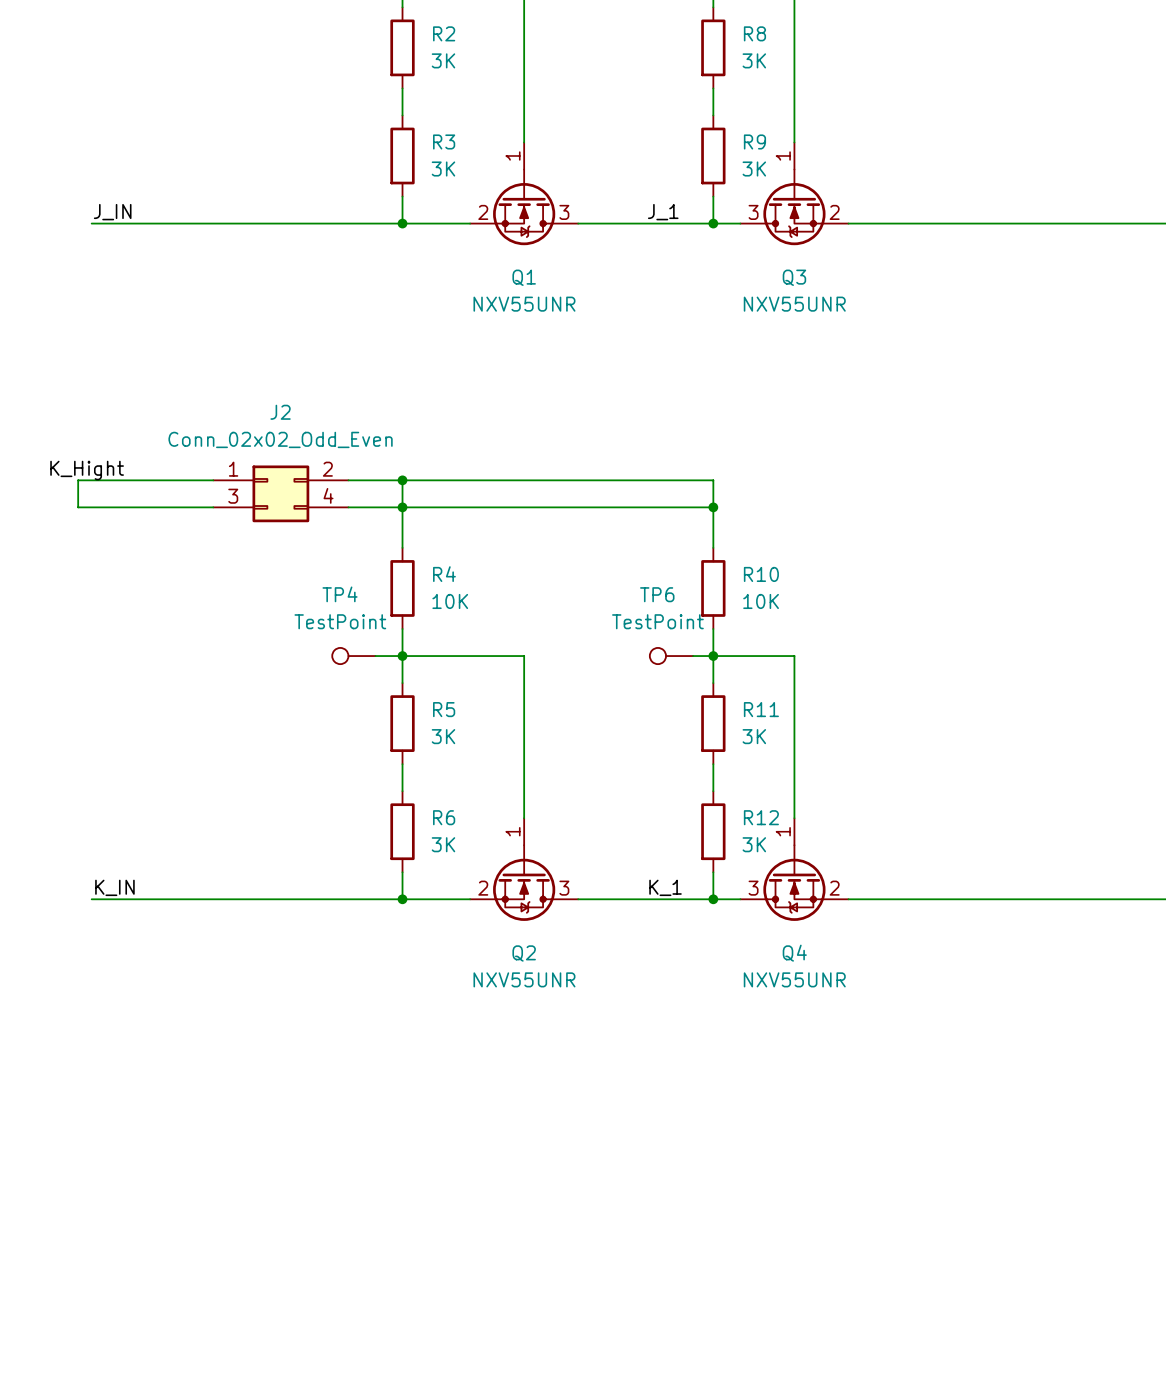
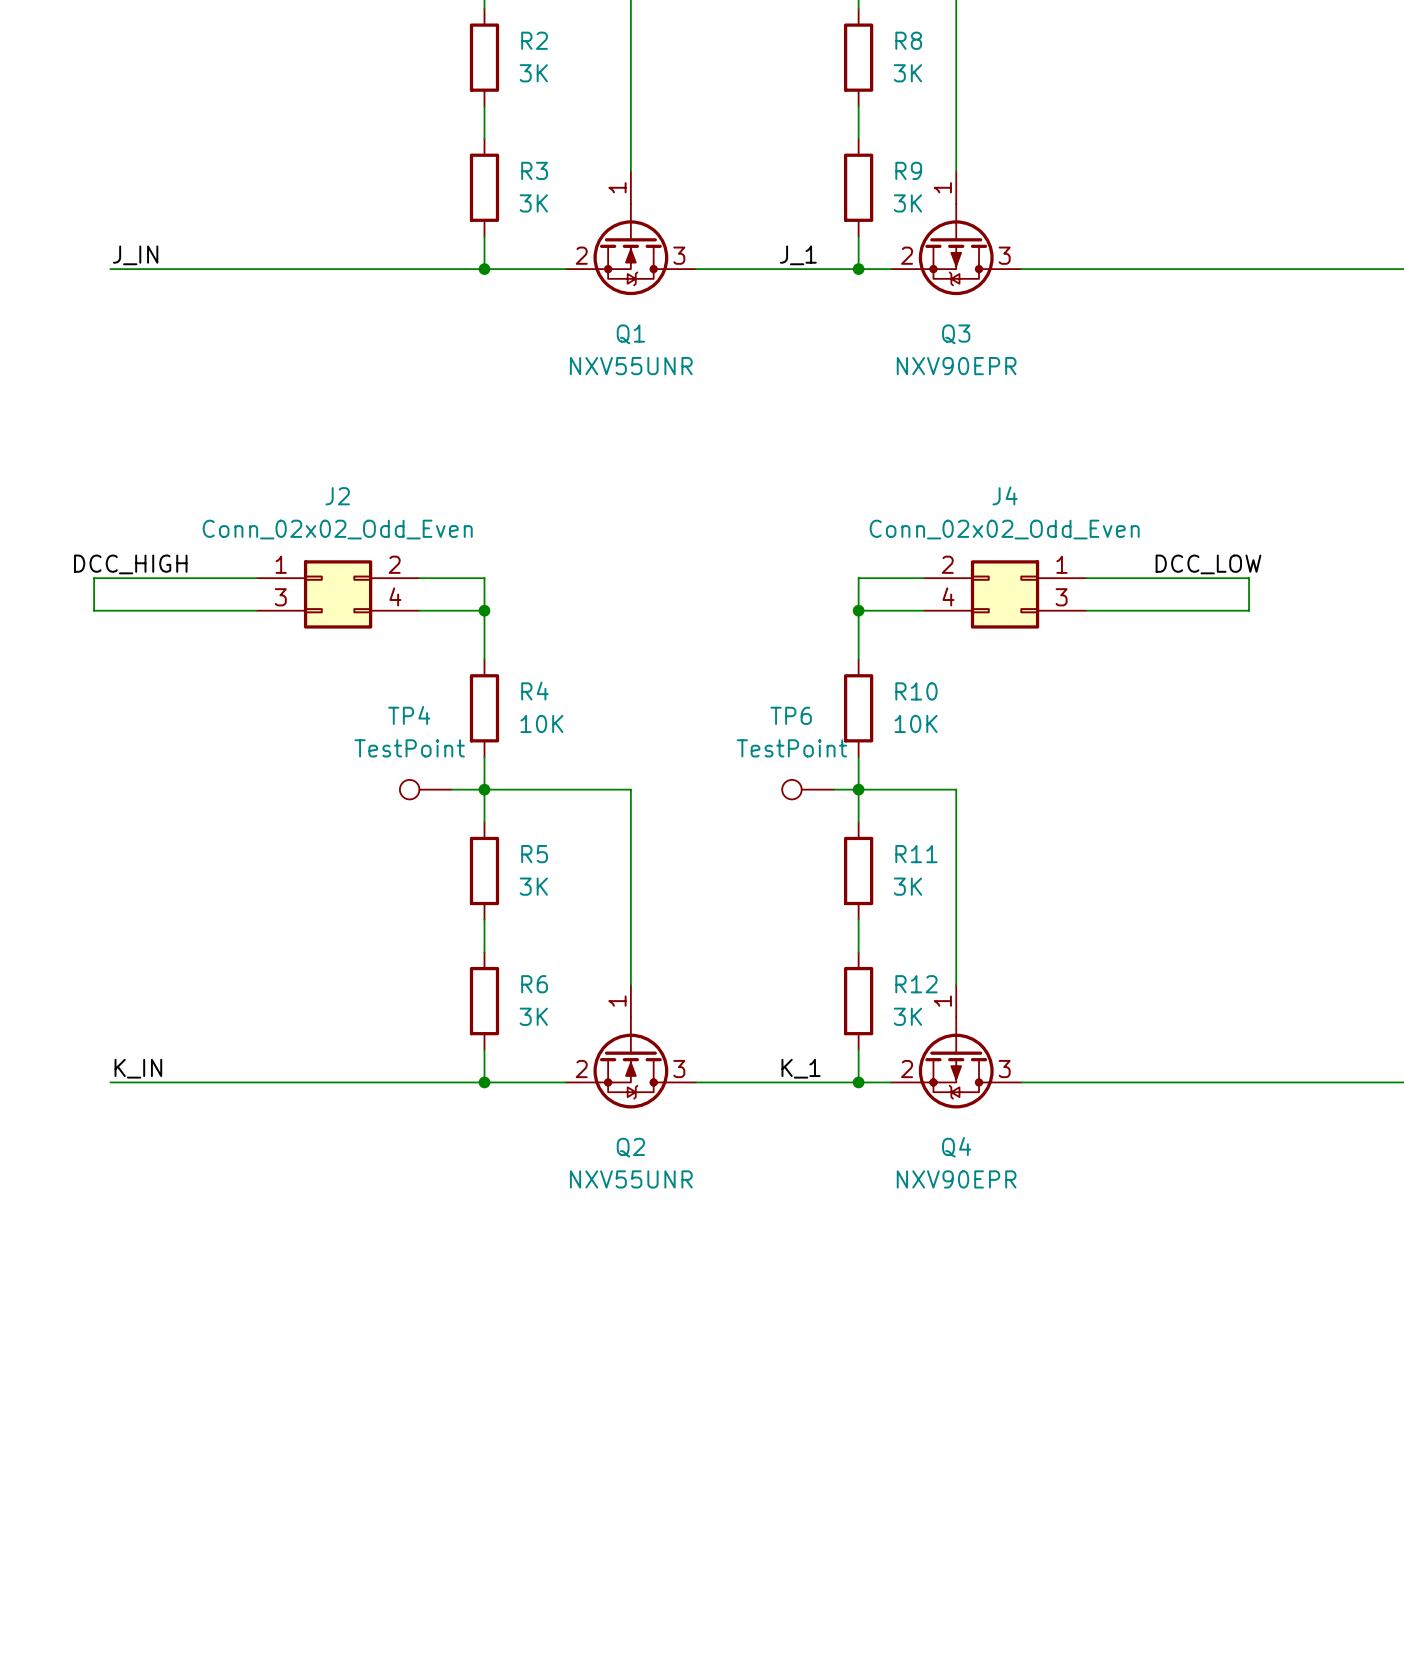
Q3 symbol: [740, 142, 849, 246] -> [891, 171, 1022, 296]
Q3 value: NXV55UNR (794, 304) -> NXV90EPR (956, 366)
label: none -> DCC_HIGH (130, 564)
label: none -> DCC_LOW (1208, 564)
label: K_Hight (87, 470) -> none
wire: (402, 480) (713, 480) -> (923, 578) (858, 578)
junction: (402, 480) -> none
wire: none -> (1086, 578) (1249, 578) (1249, 610) (1086, 610)
J4: none -> Conn_02x02_Odd_Even (1005, 594)
wire: (402, 507) (713, 507) -> (923, 610) (858, 610)
Q4 symbol: [740, 818, 849, 921] -> [891, 984, 1022, 1109]
Q4 value: NXV55UNR (794, 979) -> NXV90EPR (956, 1179)

